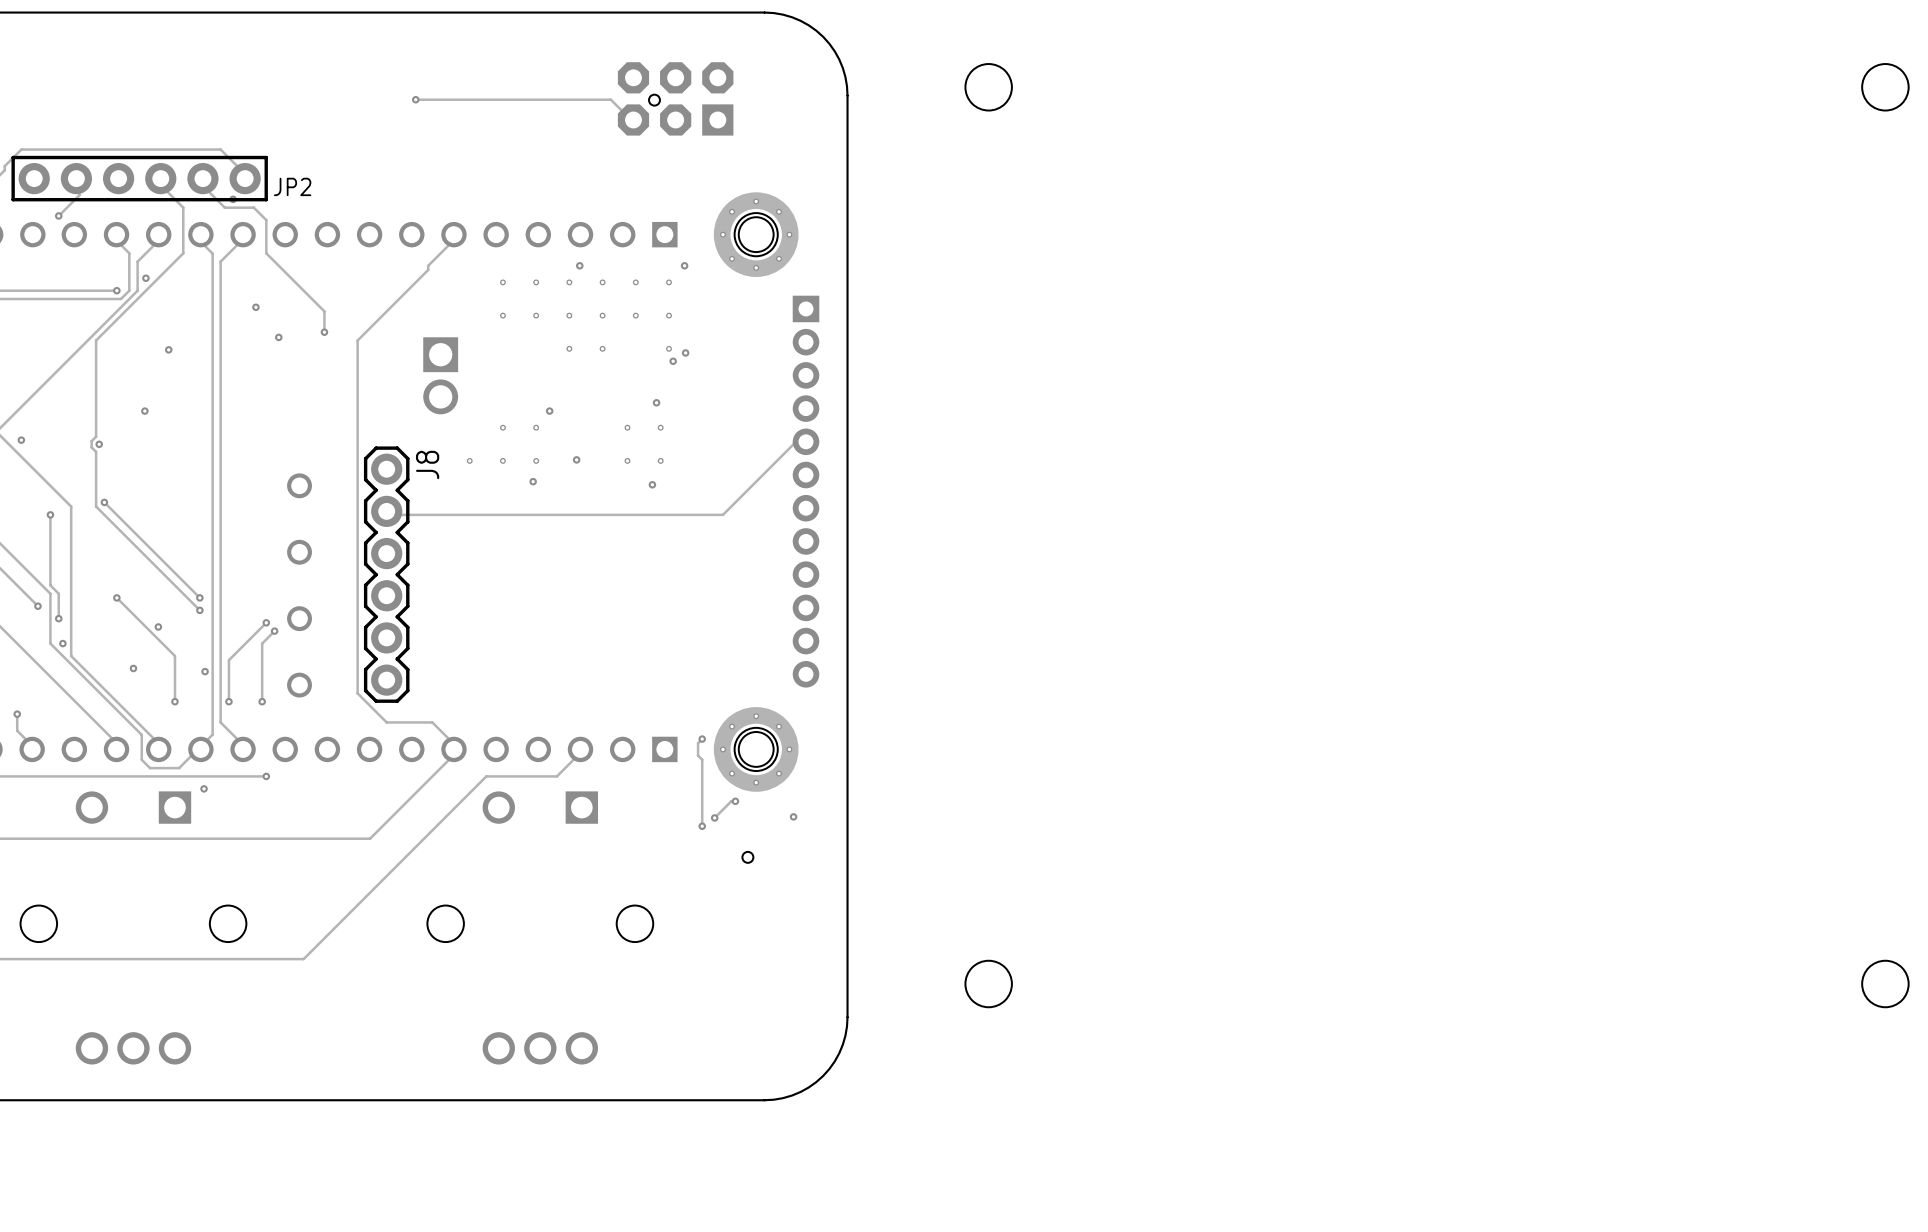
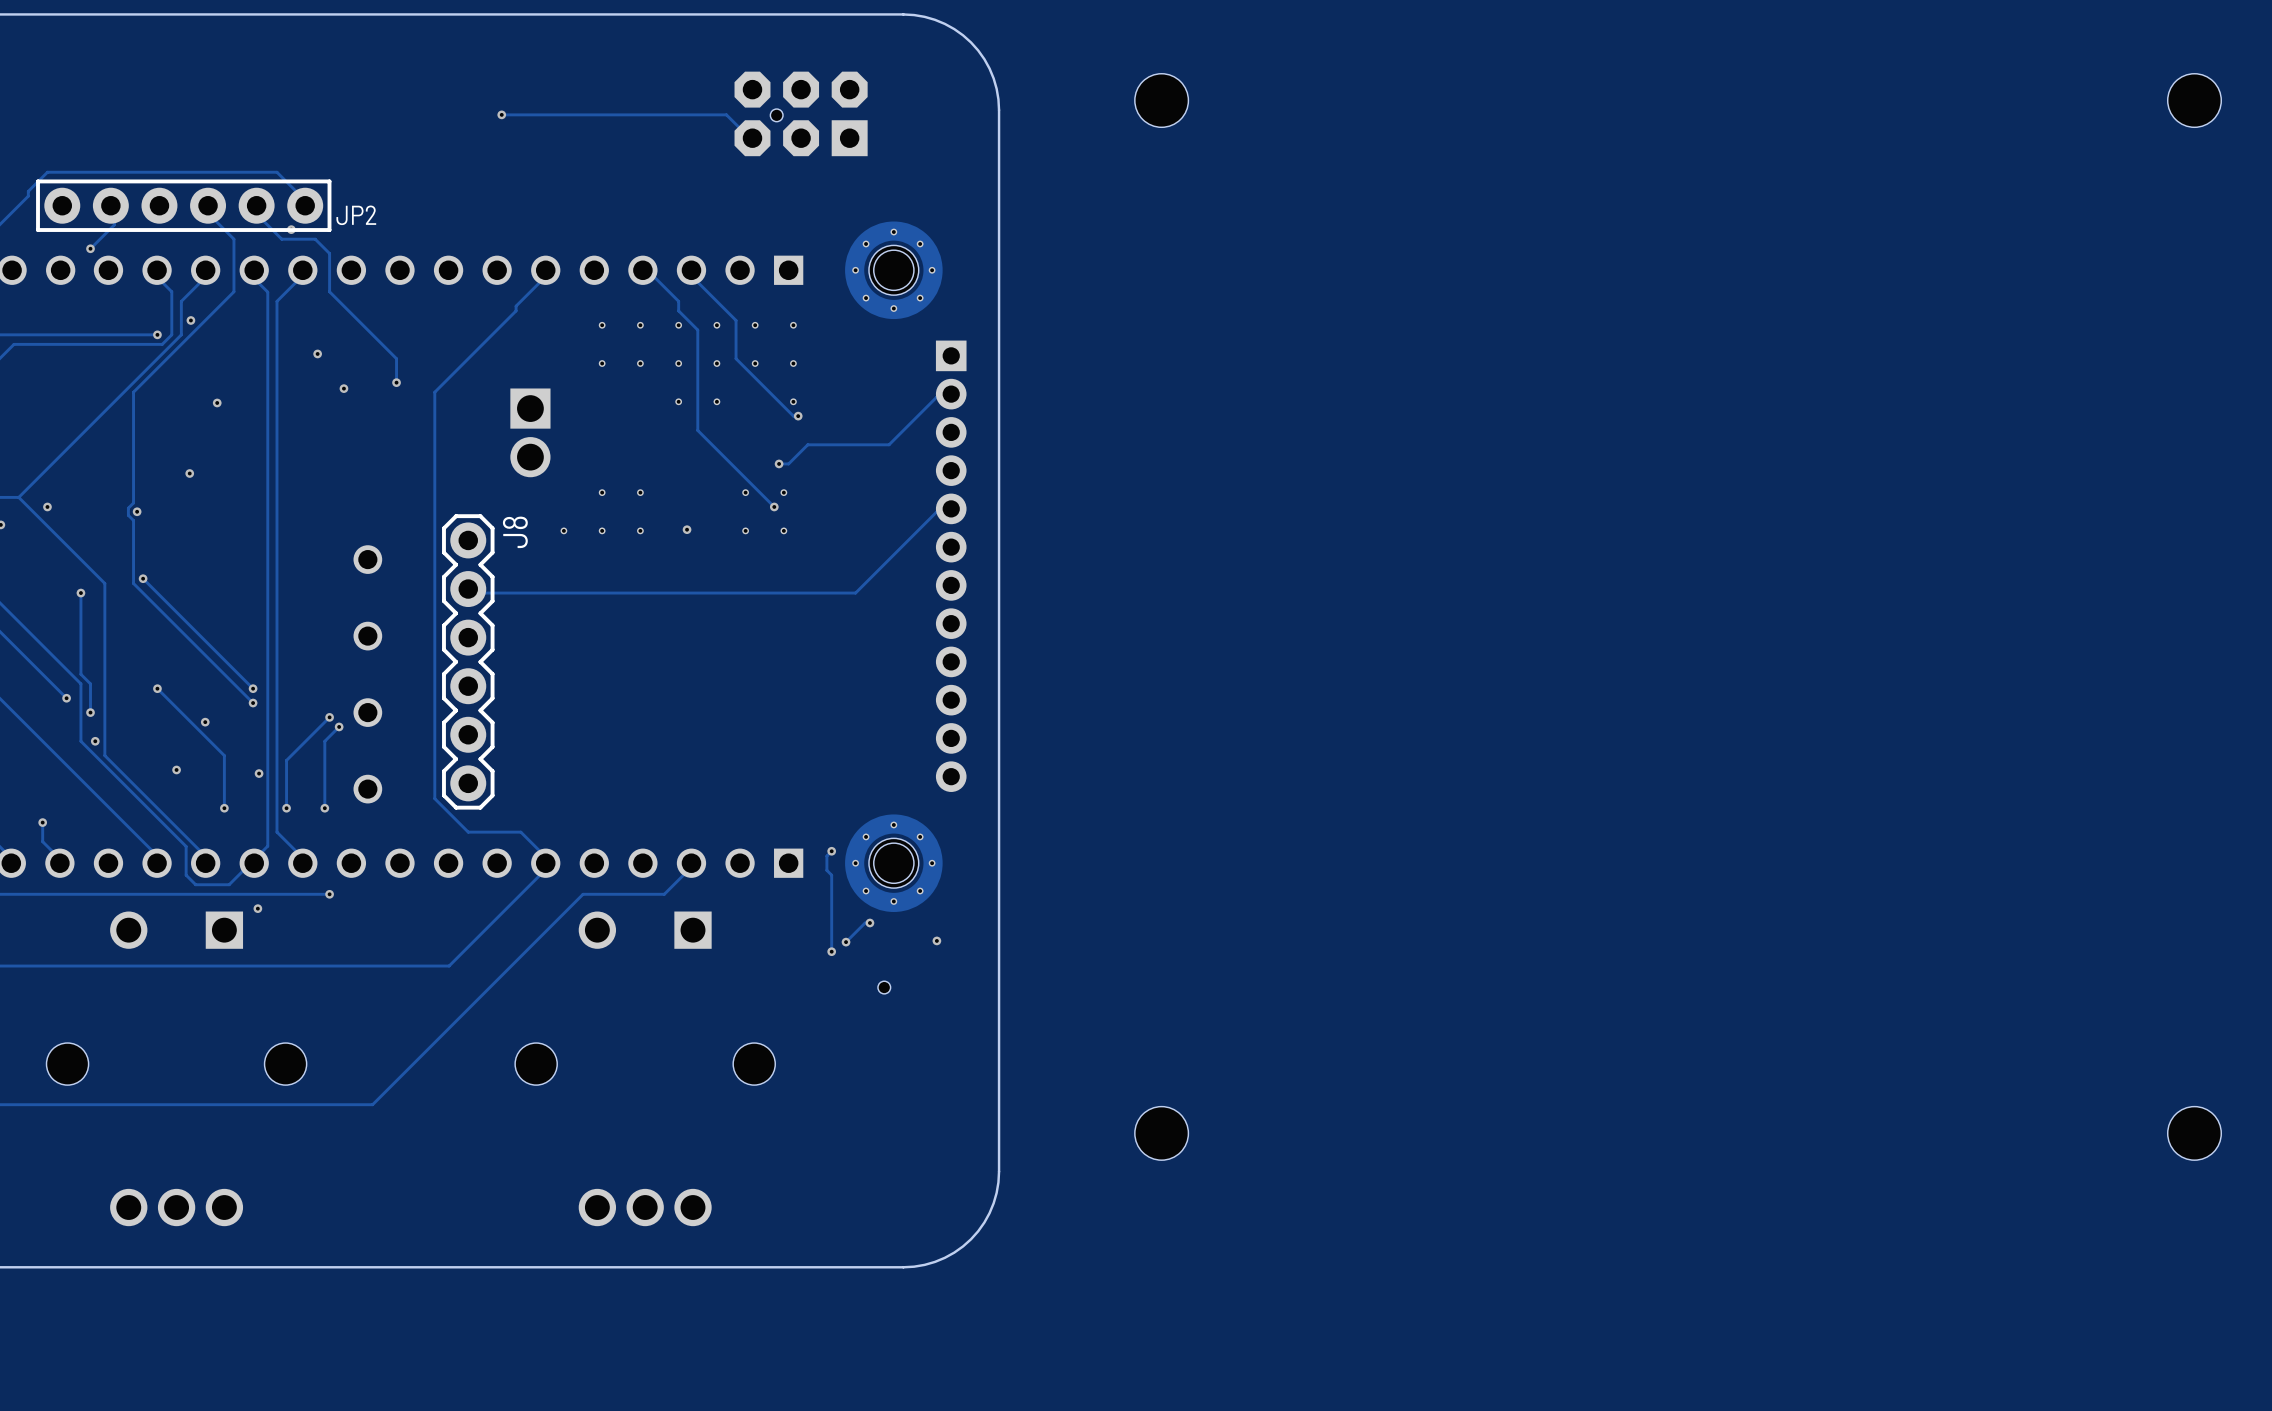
track: none -> (642, 270) (645, 272) (649, 272) (678, 301) (678, 310) (697, 330) (697, 430) (774, 506)
track: none -> (691, 270) (688, 272) (736, 320) (736, 358) (793, 416) (798, 416)
via: (579, 265) -> none
via: (684, 265) -> none
track: none -> (951, 394) (951, 396) (936, 396) (889, 444) (807, 444) (788, 463) (779, 463)
via: (685, 352) -> none
via: (549, 411) -> none
via: (533, 481) -> none
via position: (652, 484) -> (774, 506)

